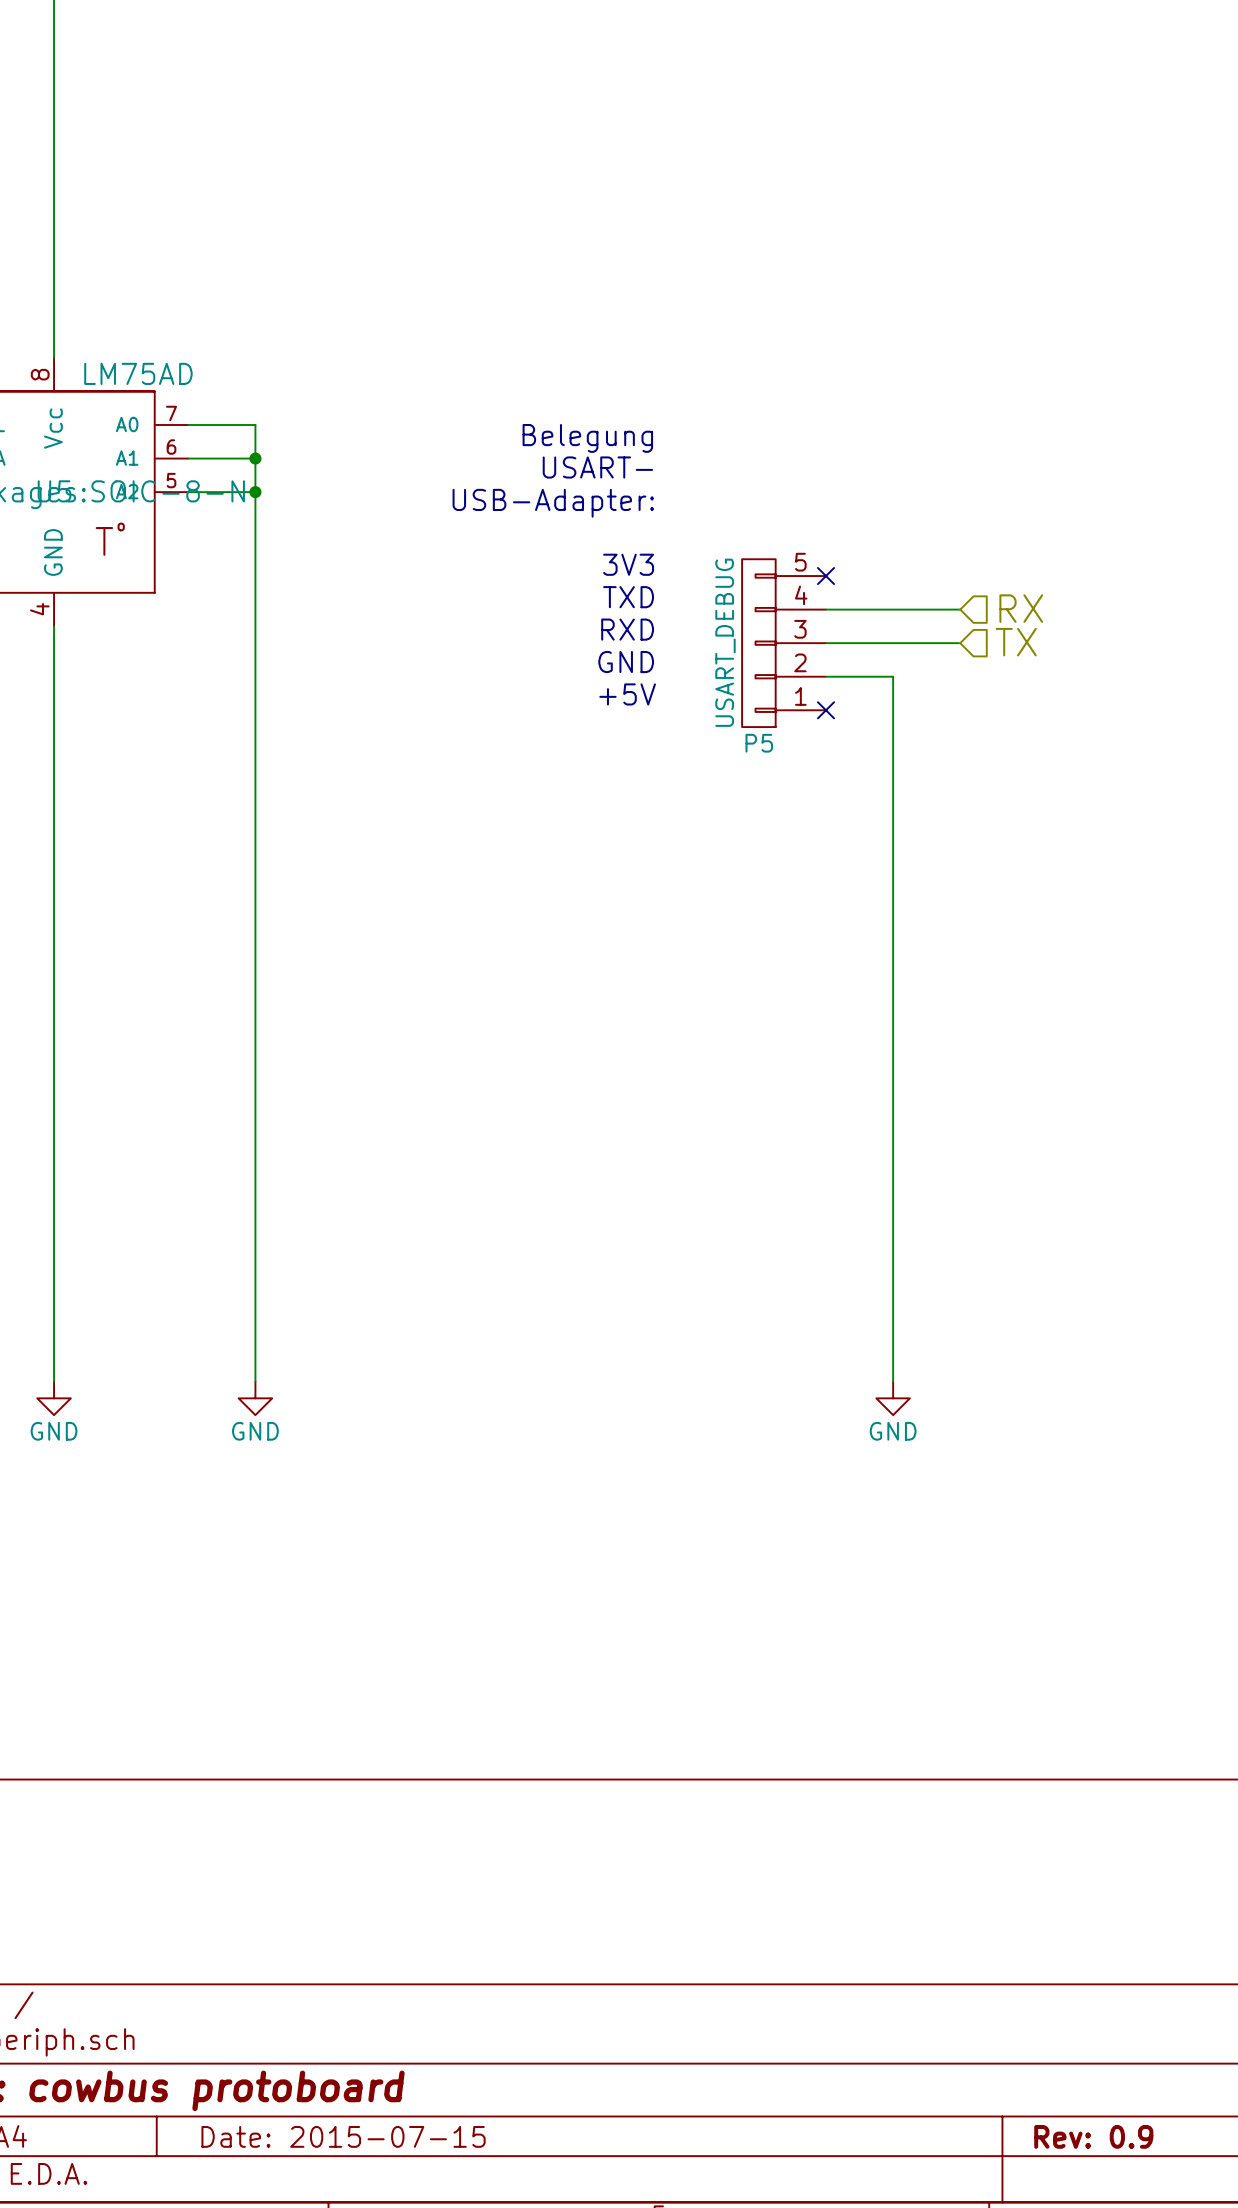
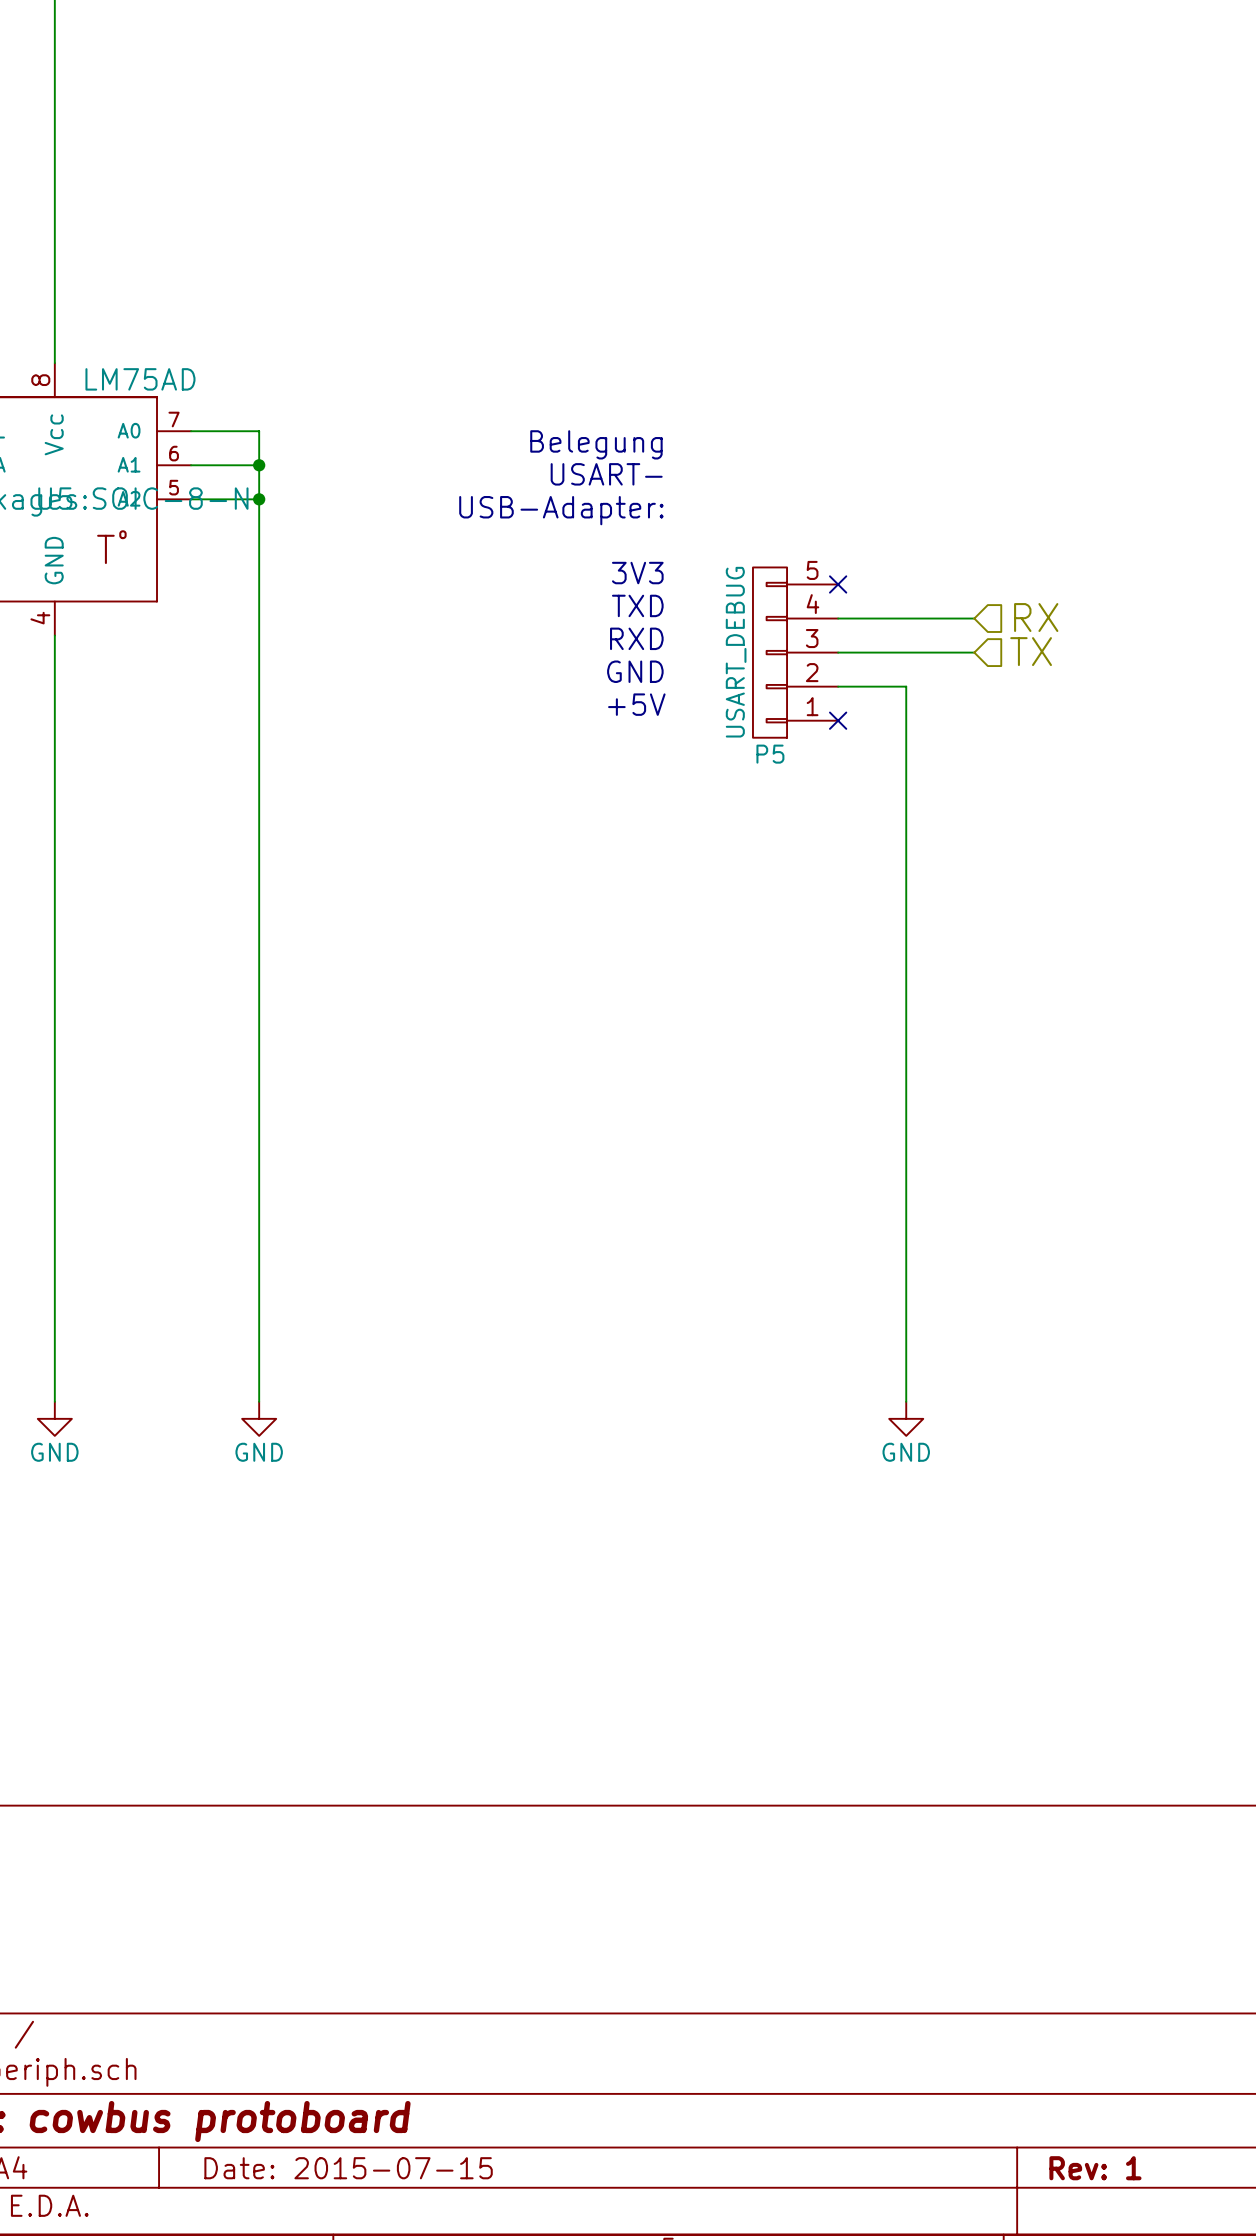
title block: Rev: 0.9 (1093, 2136) -> Rev: 1 (1095, 2168)

